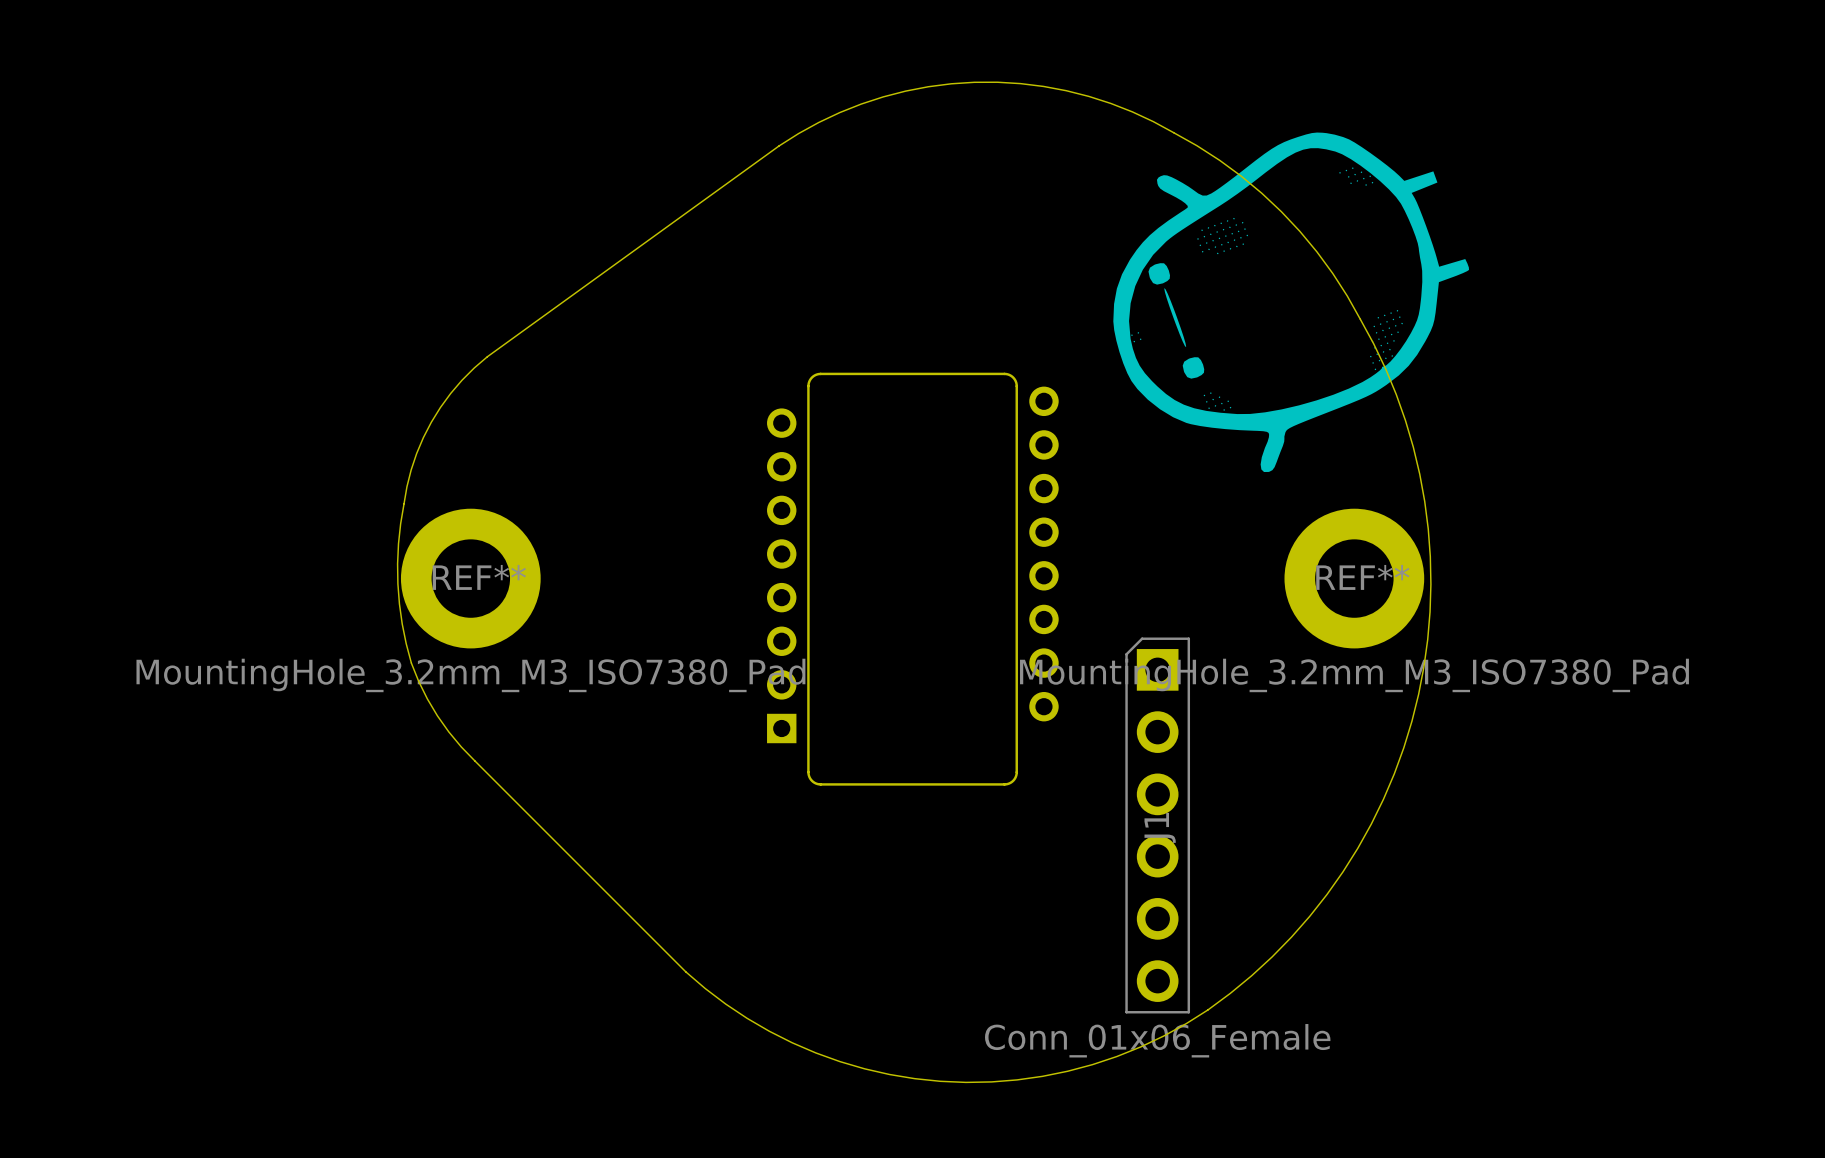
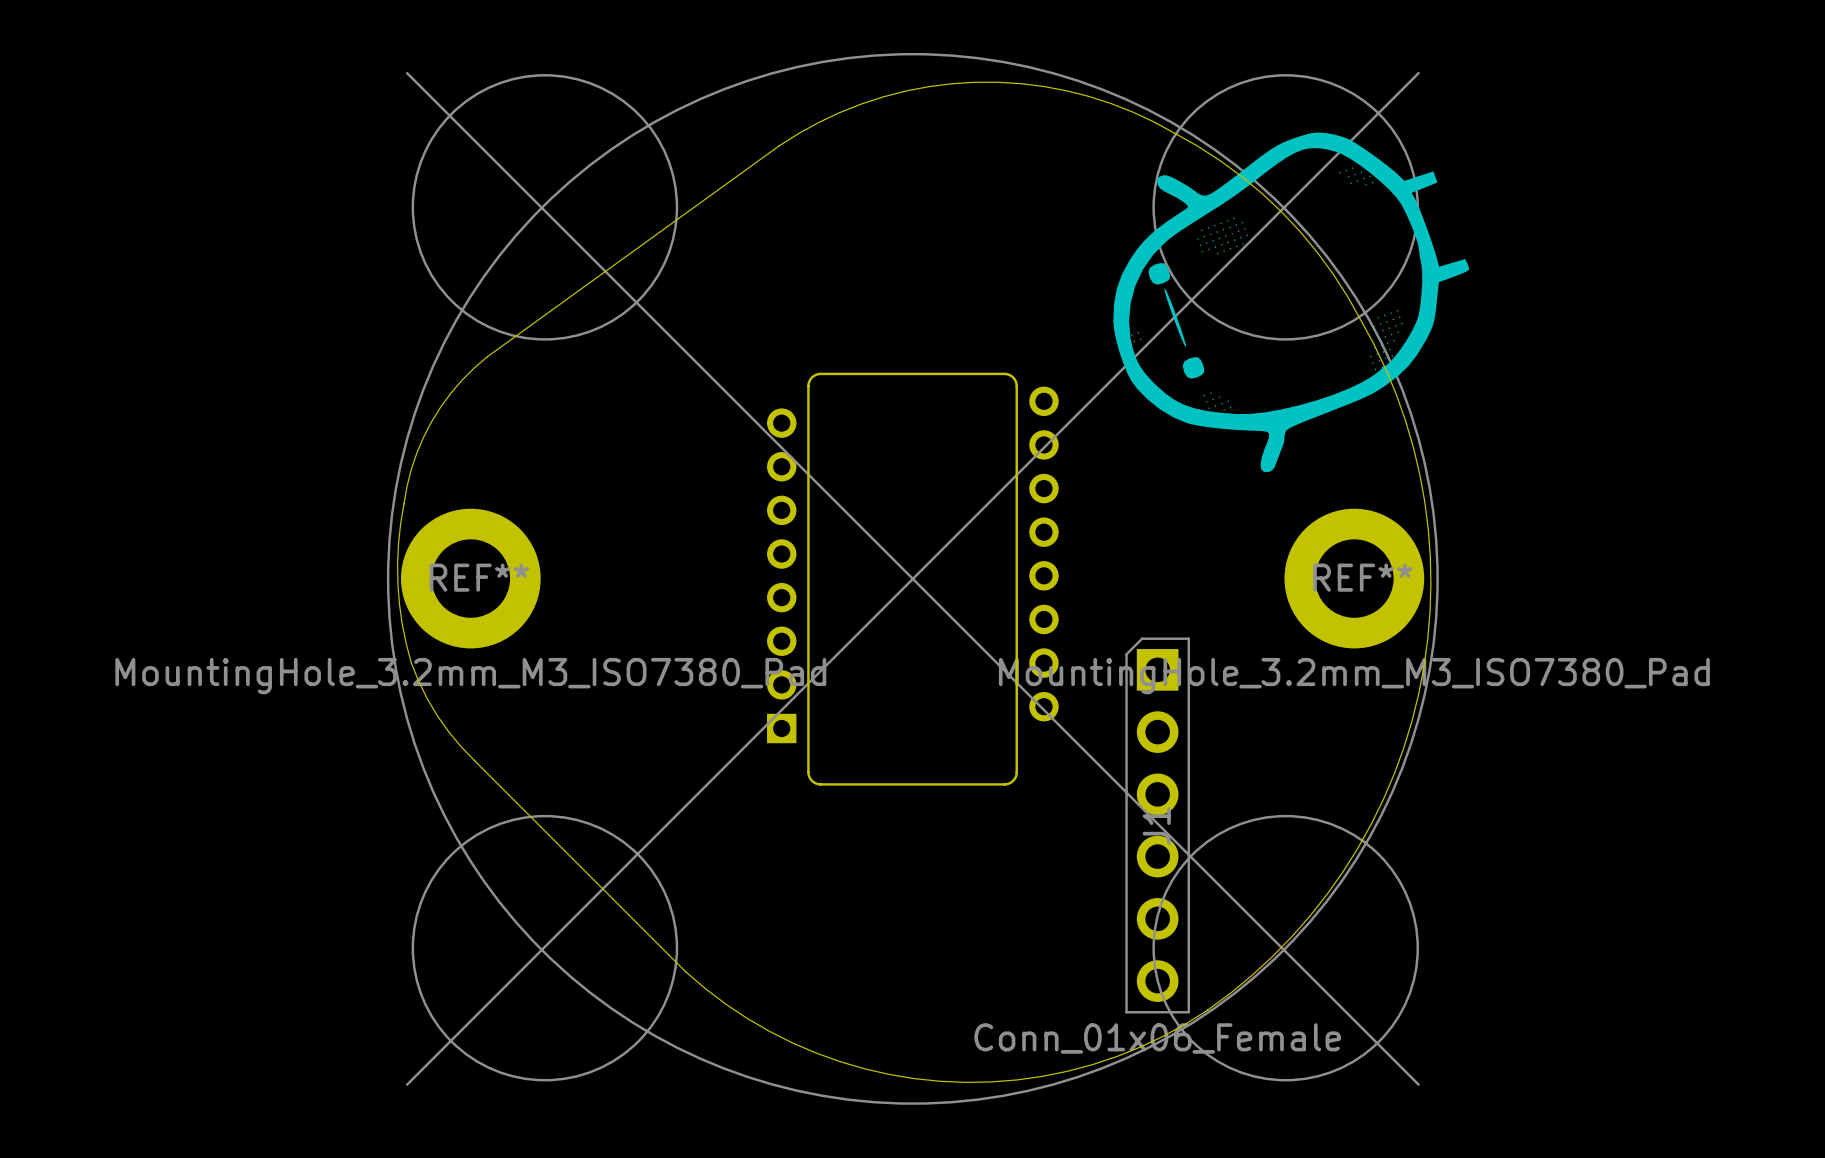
drawing: none -> [386, 52, 1439, 1105]
line: none -> (407, 73) (1418, 1084)
line: none -> (1418, 73) (407, 1084)

